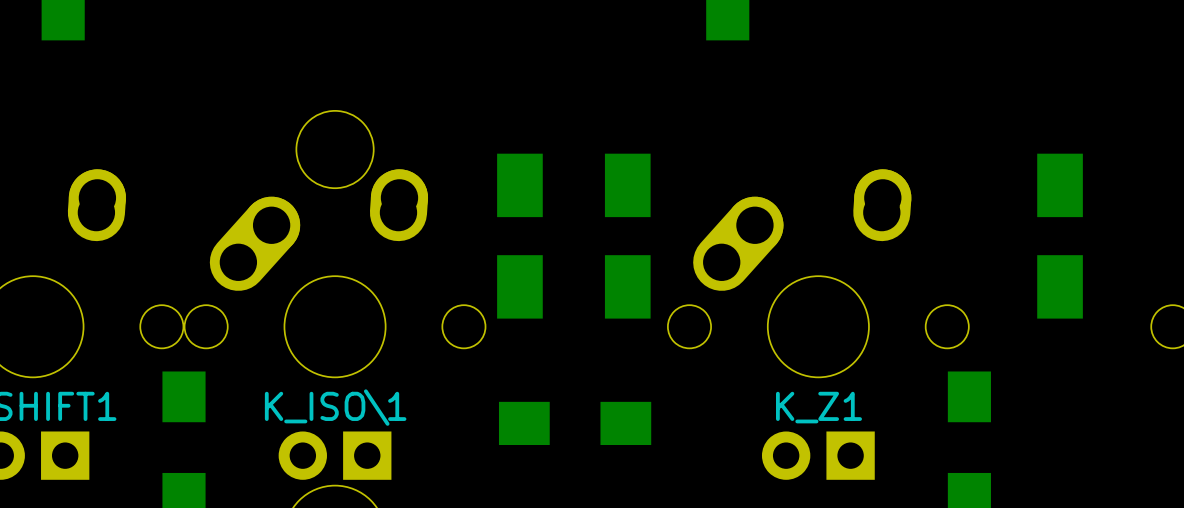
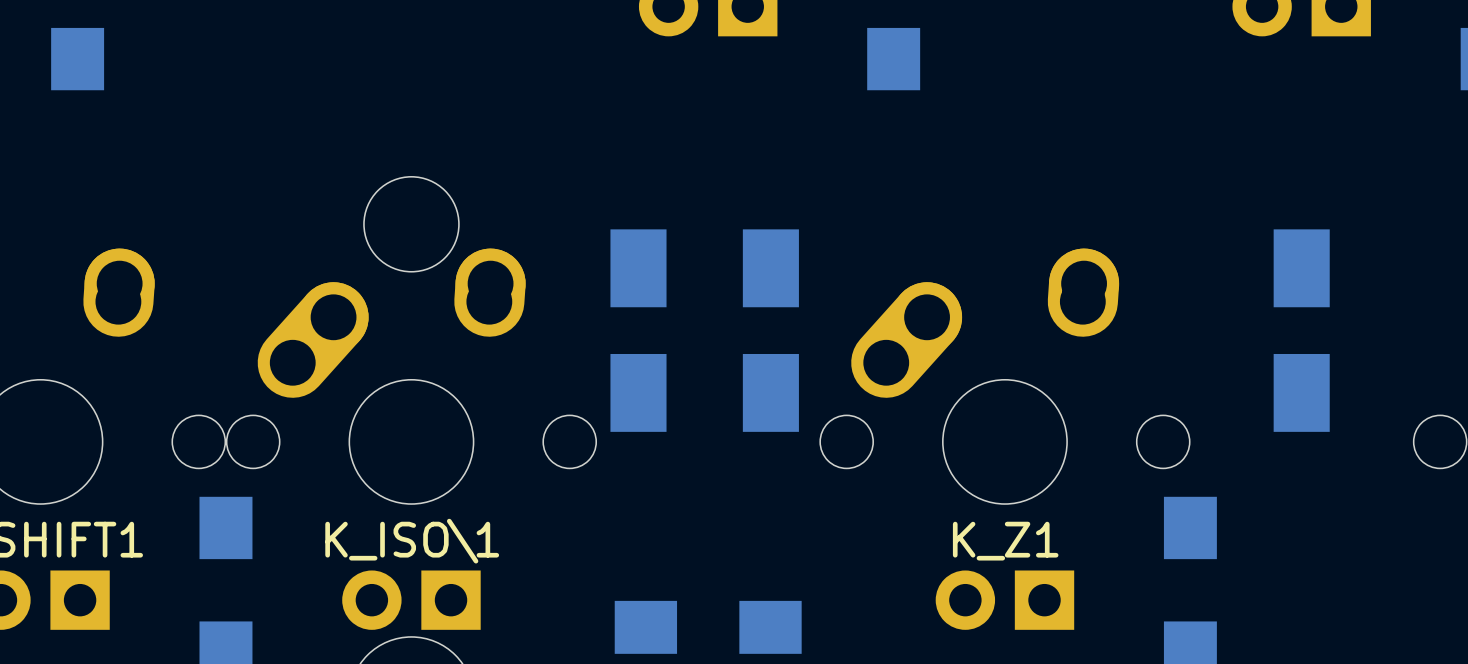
part position: (575, 423) -> (708, 627)

